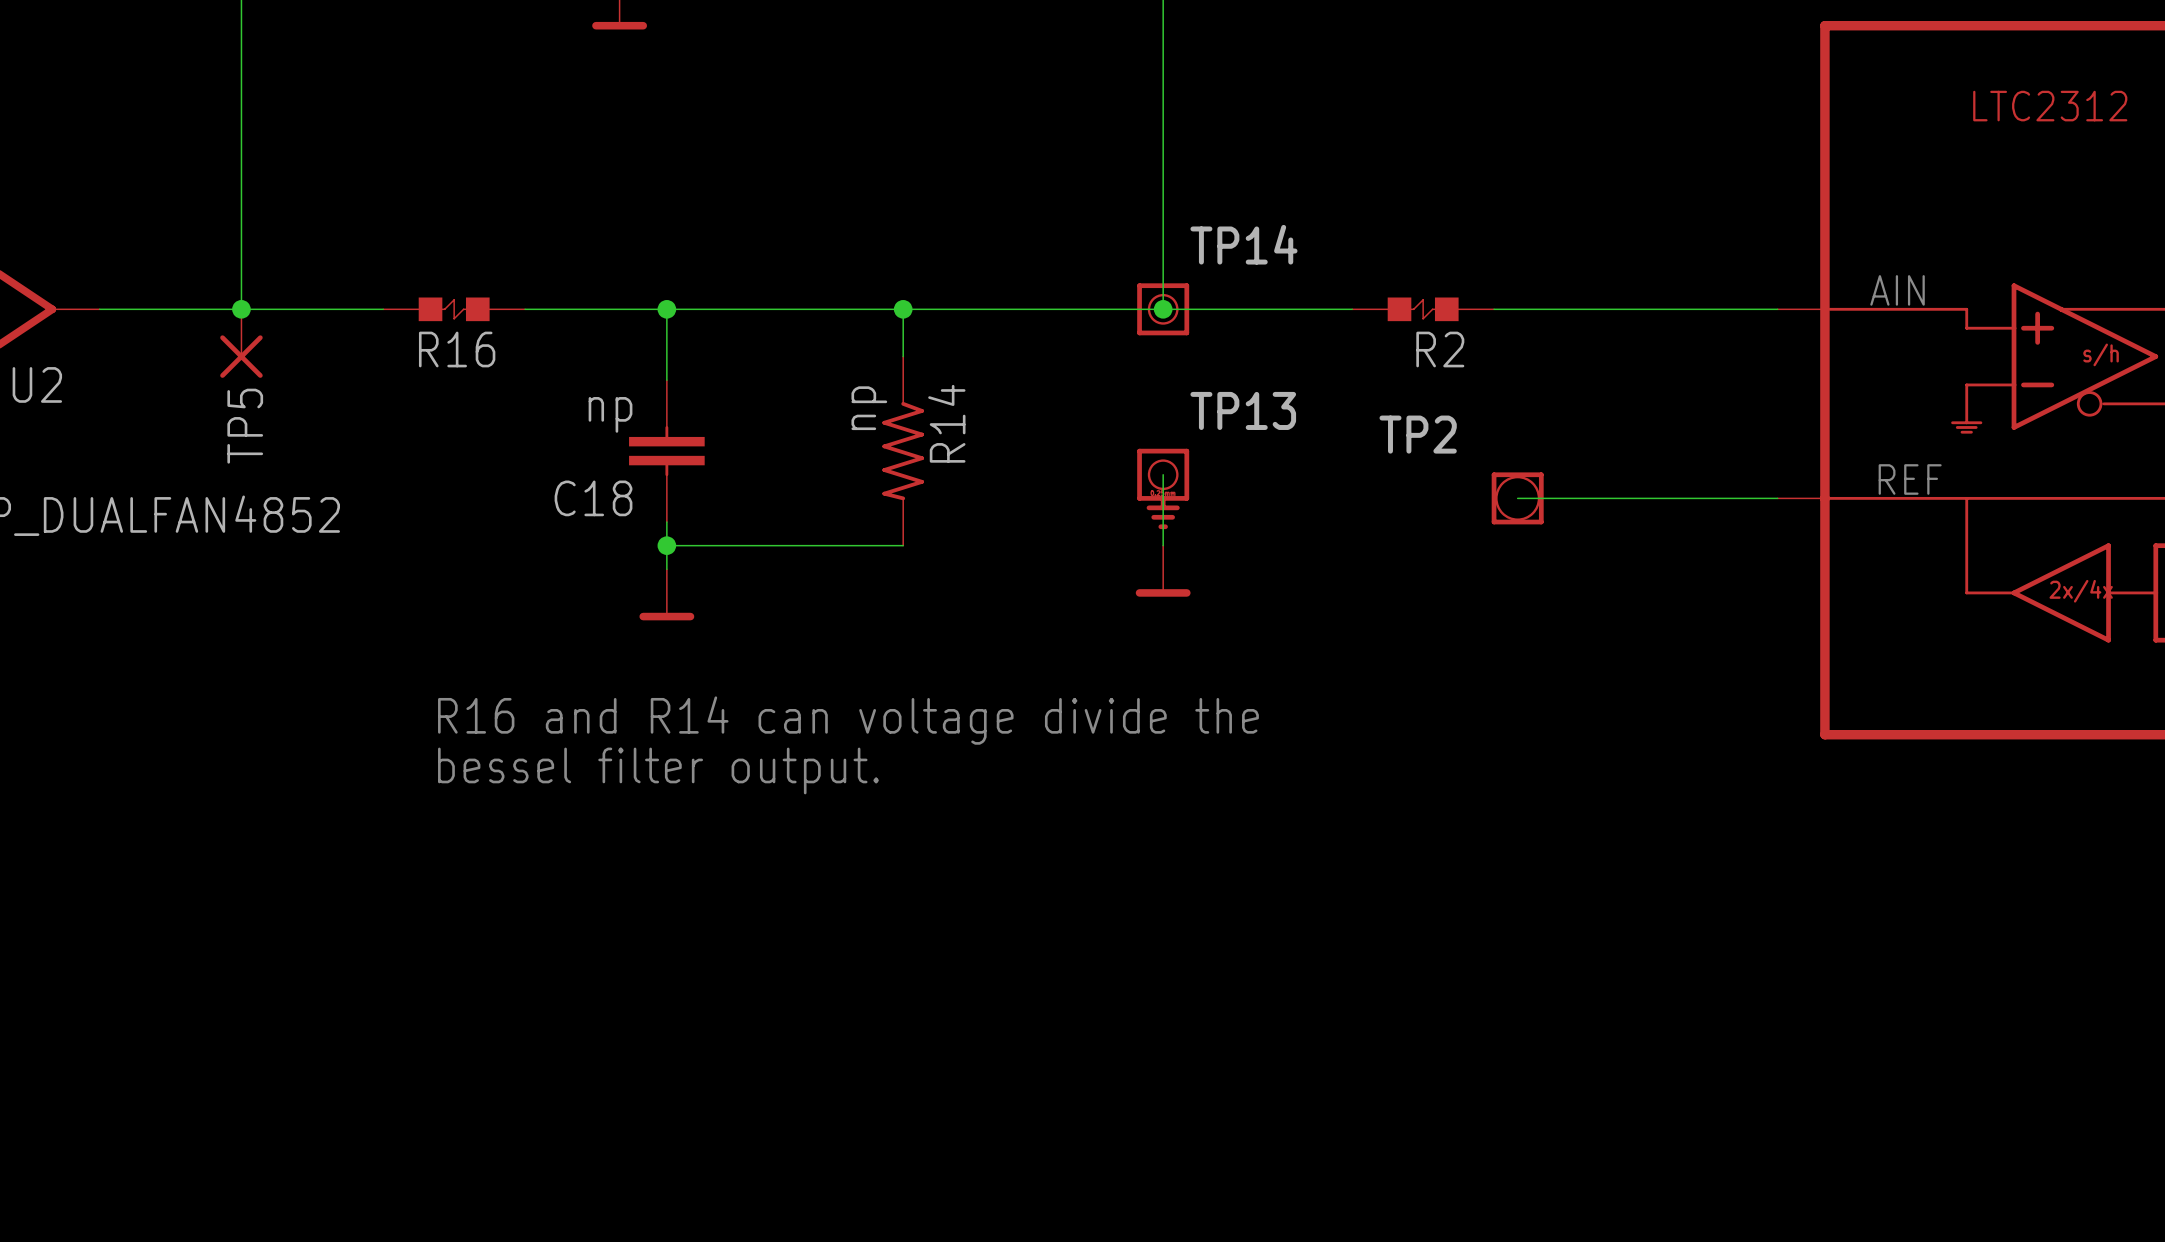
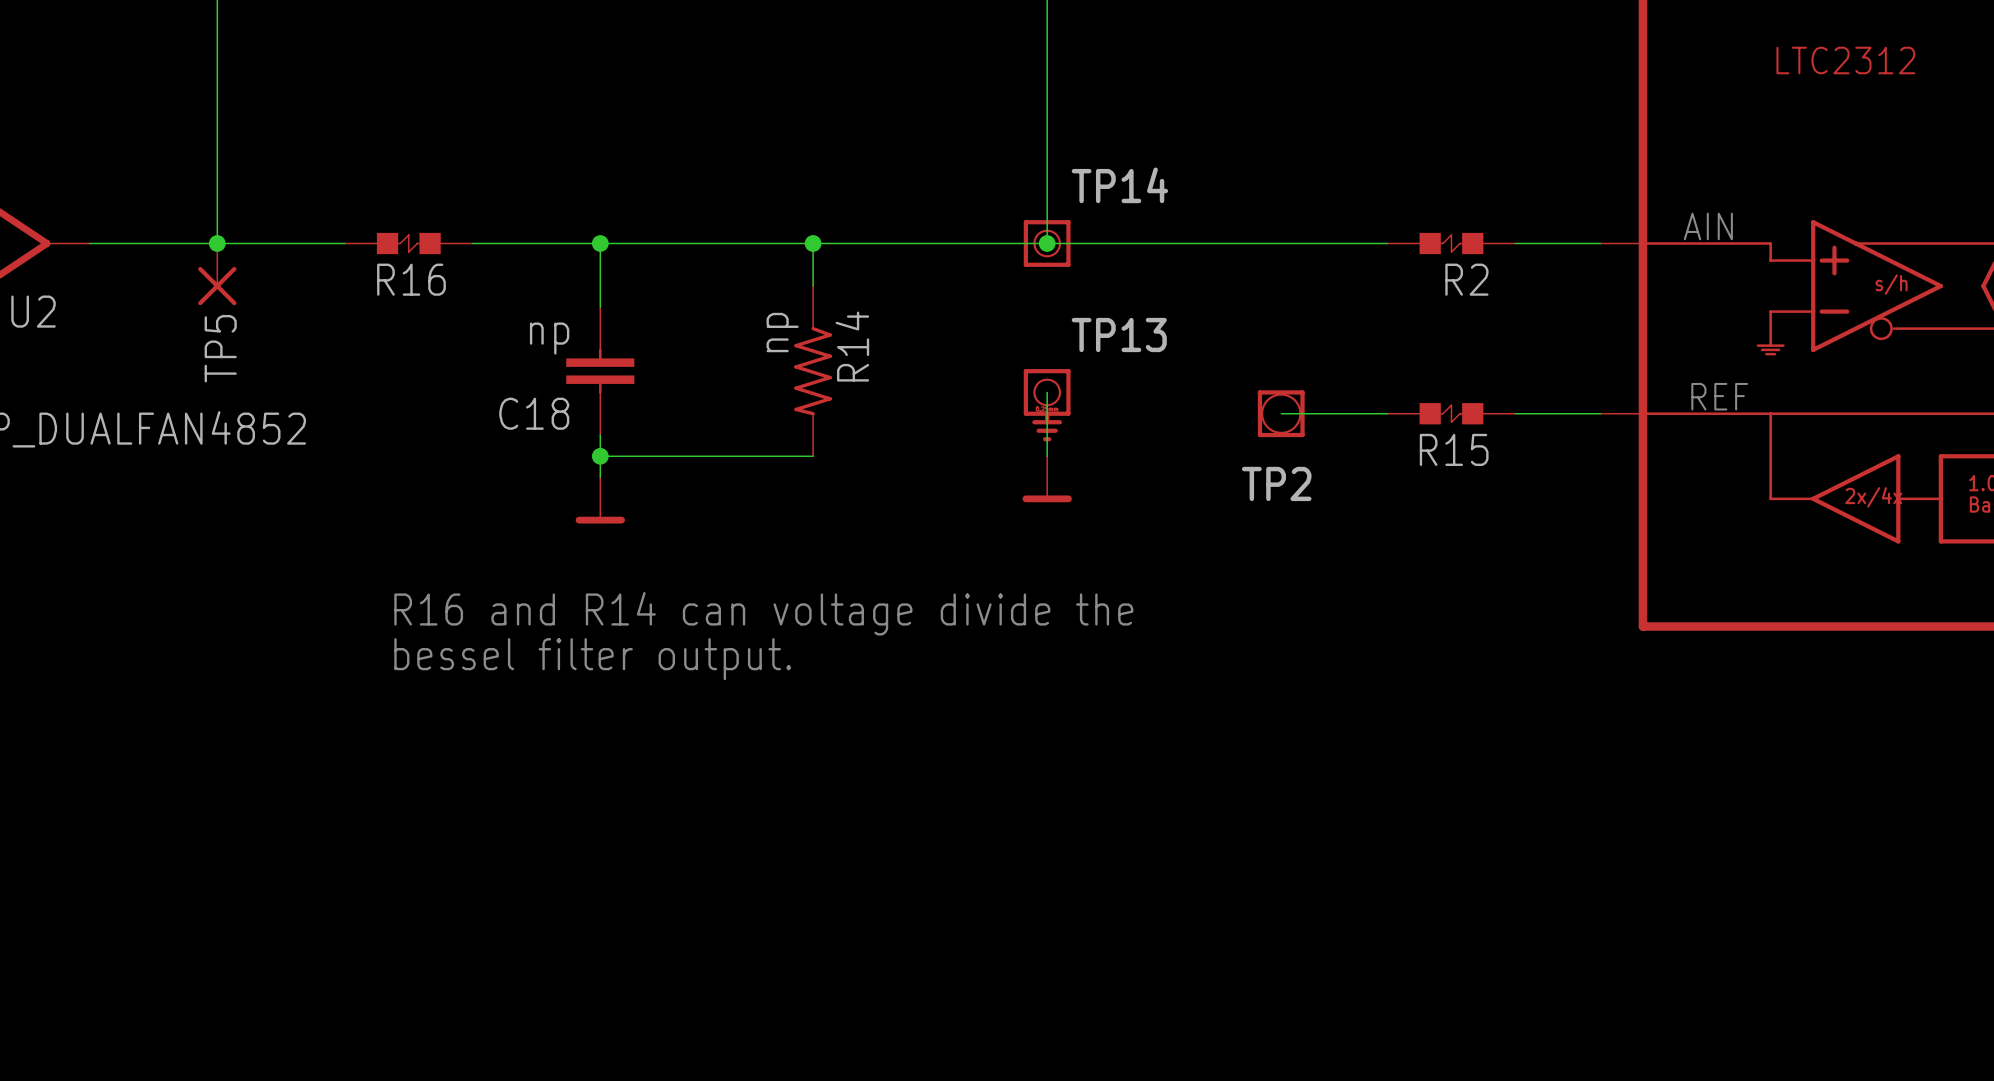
R2 position: (1423, 309) -> (1451, 243)
TP2 name position: TP2 (1418, 434) -> TP2 (1276, 483)
wire: none -> (1281, 413) (1366, 413)
TP2 position: (1517, 498) -> (1281, 413)
R15: none -> (1451, 413)

